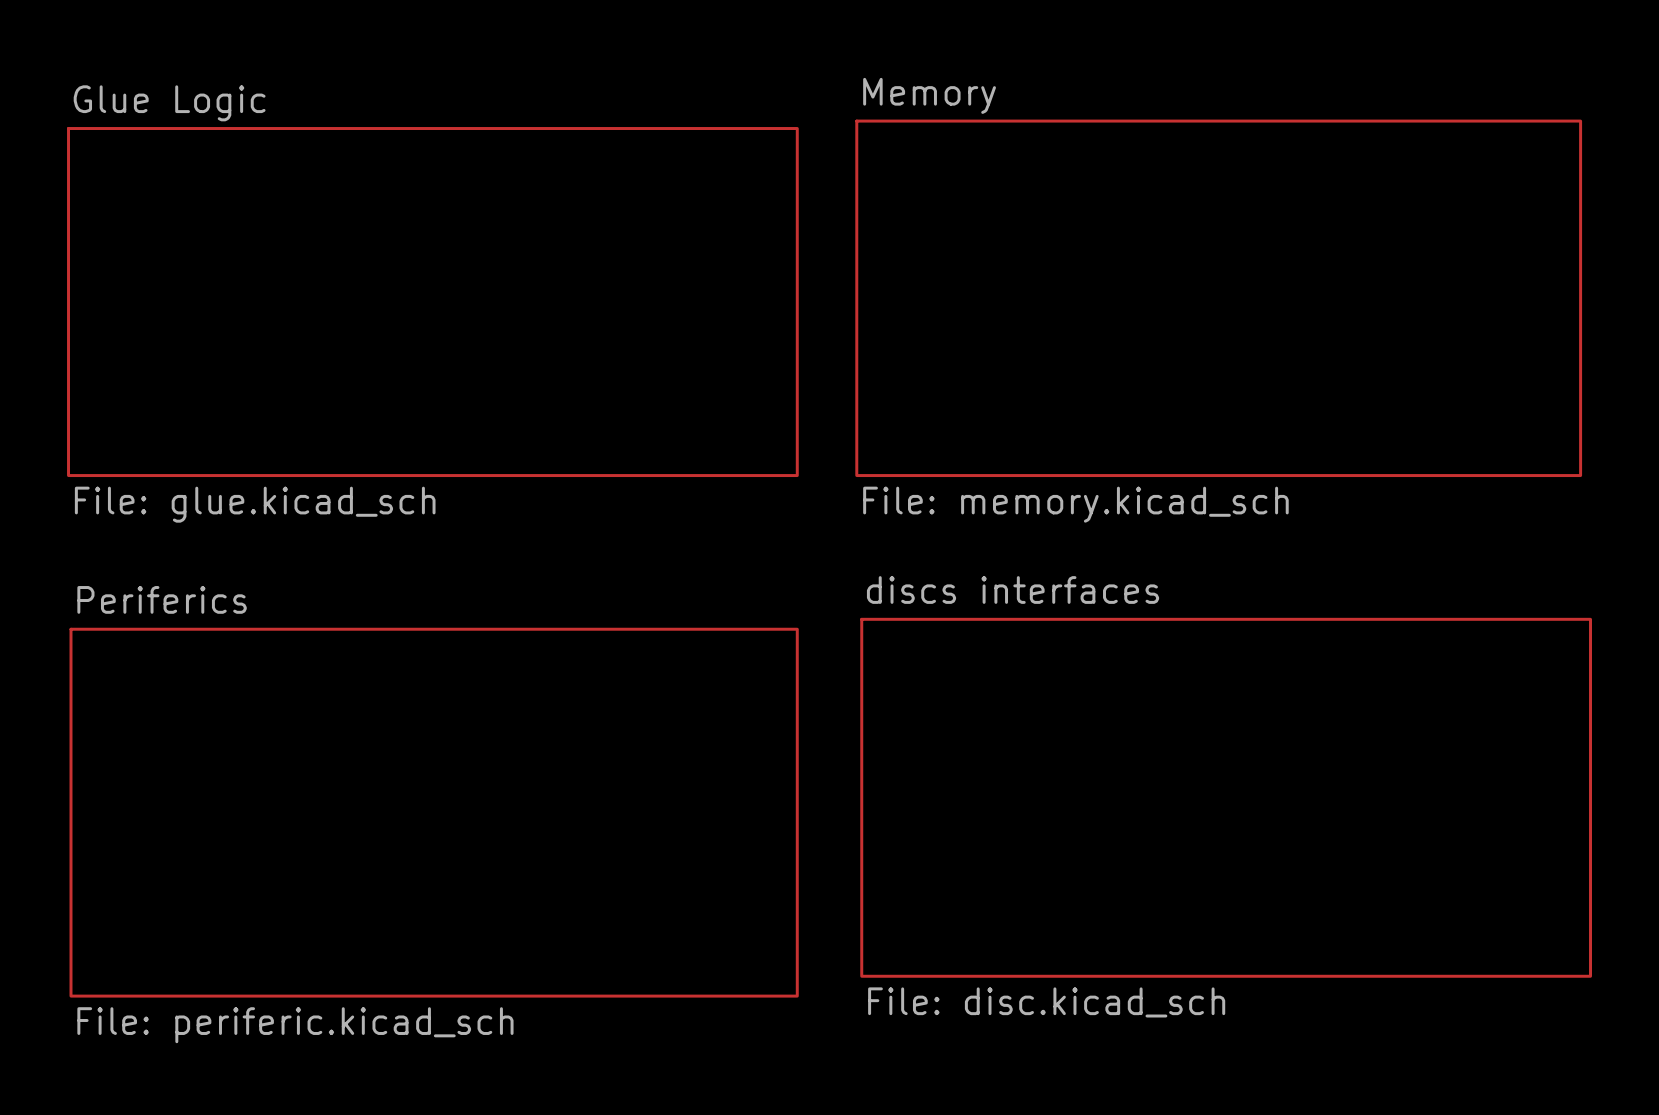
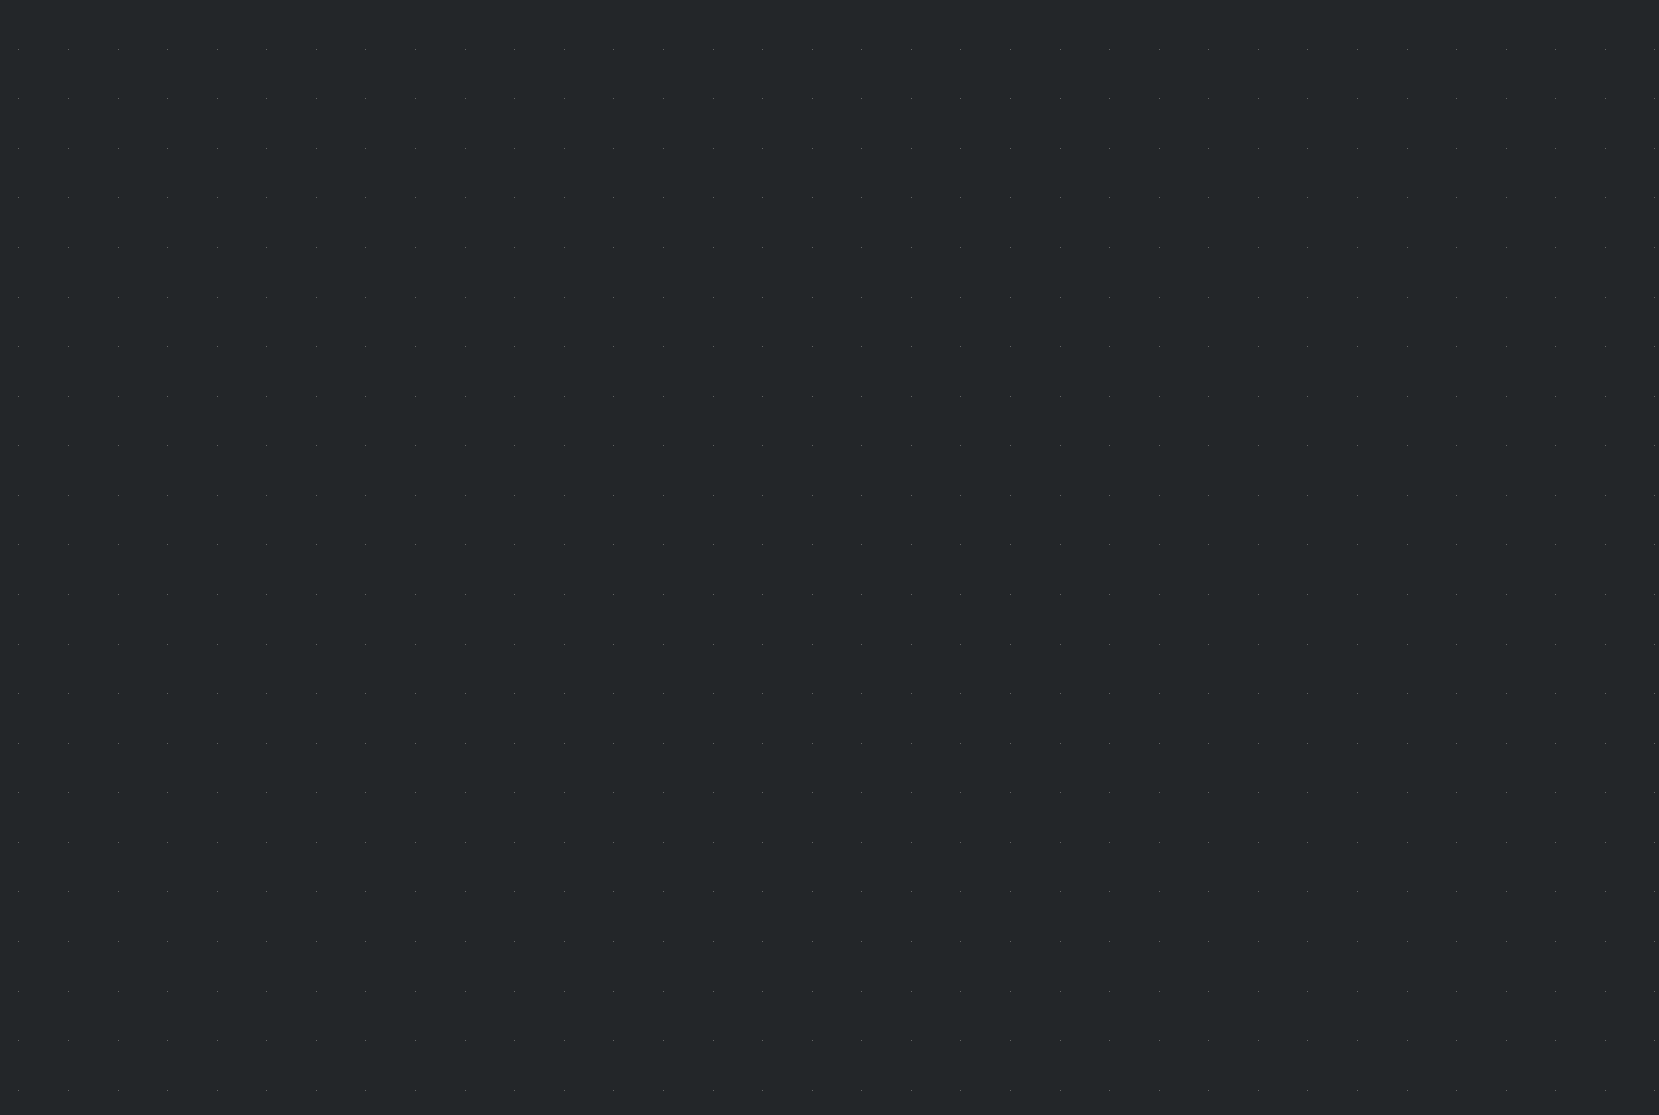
sheet Memory: File: memory.kicad_sch (1218, 298) -> none
sheet Glue Logic: File: glue.kicad_sch (432, 302) -> none
sheet discs interfaces: File: disc.kicad_sch (1226, 797) -> none
sheet Periferics: File: periferic.kicad_sch (434, 812) -> none

